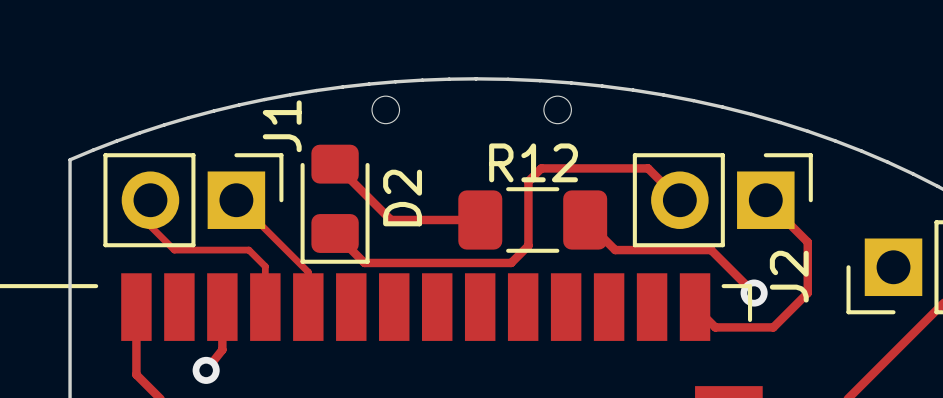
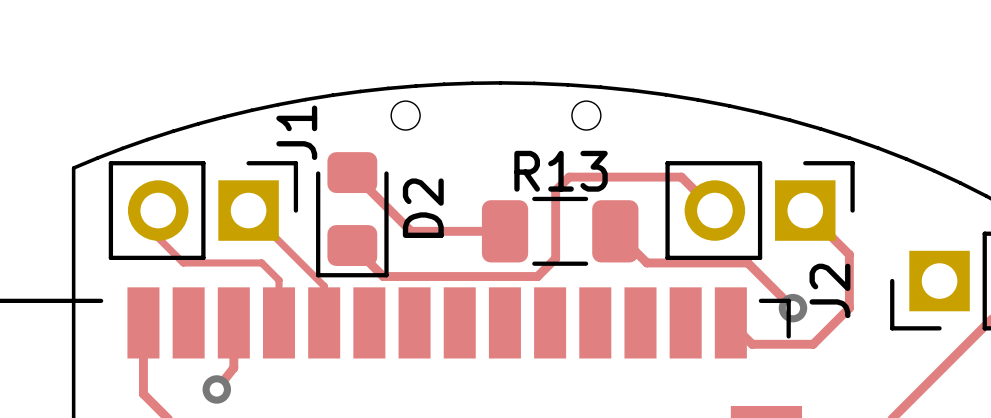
R12 name: R12 (533, 162) -> R13 (561, 171)

